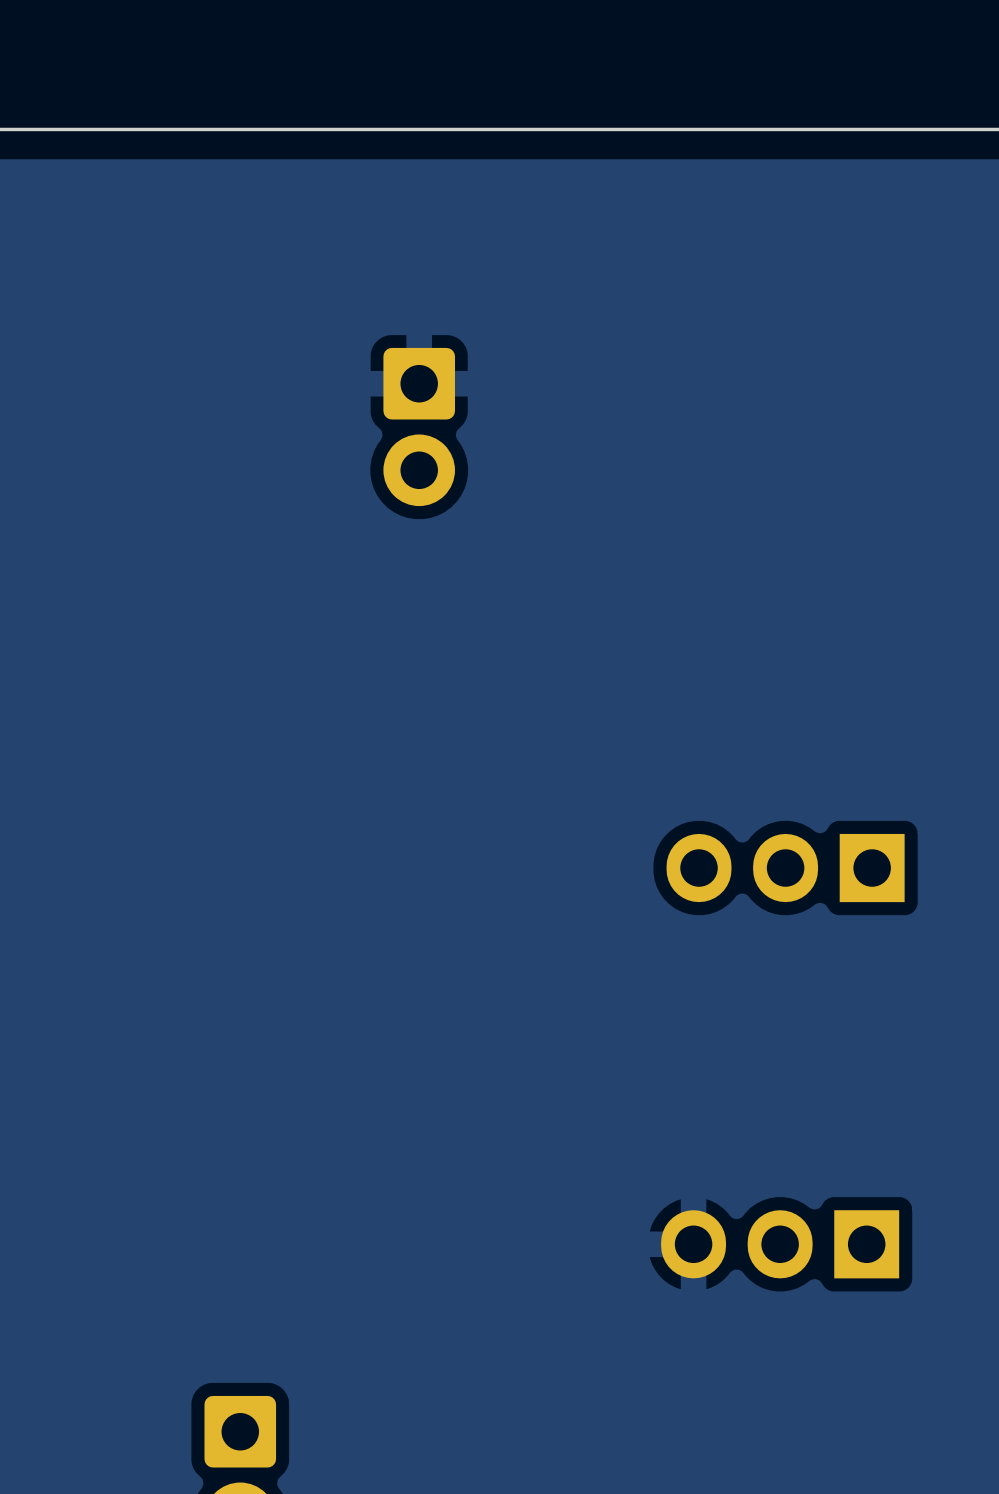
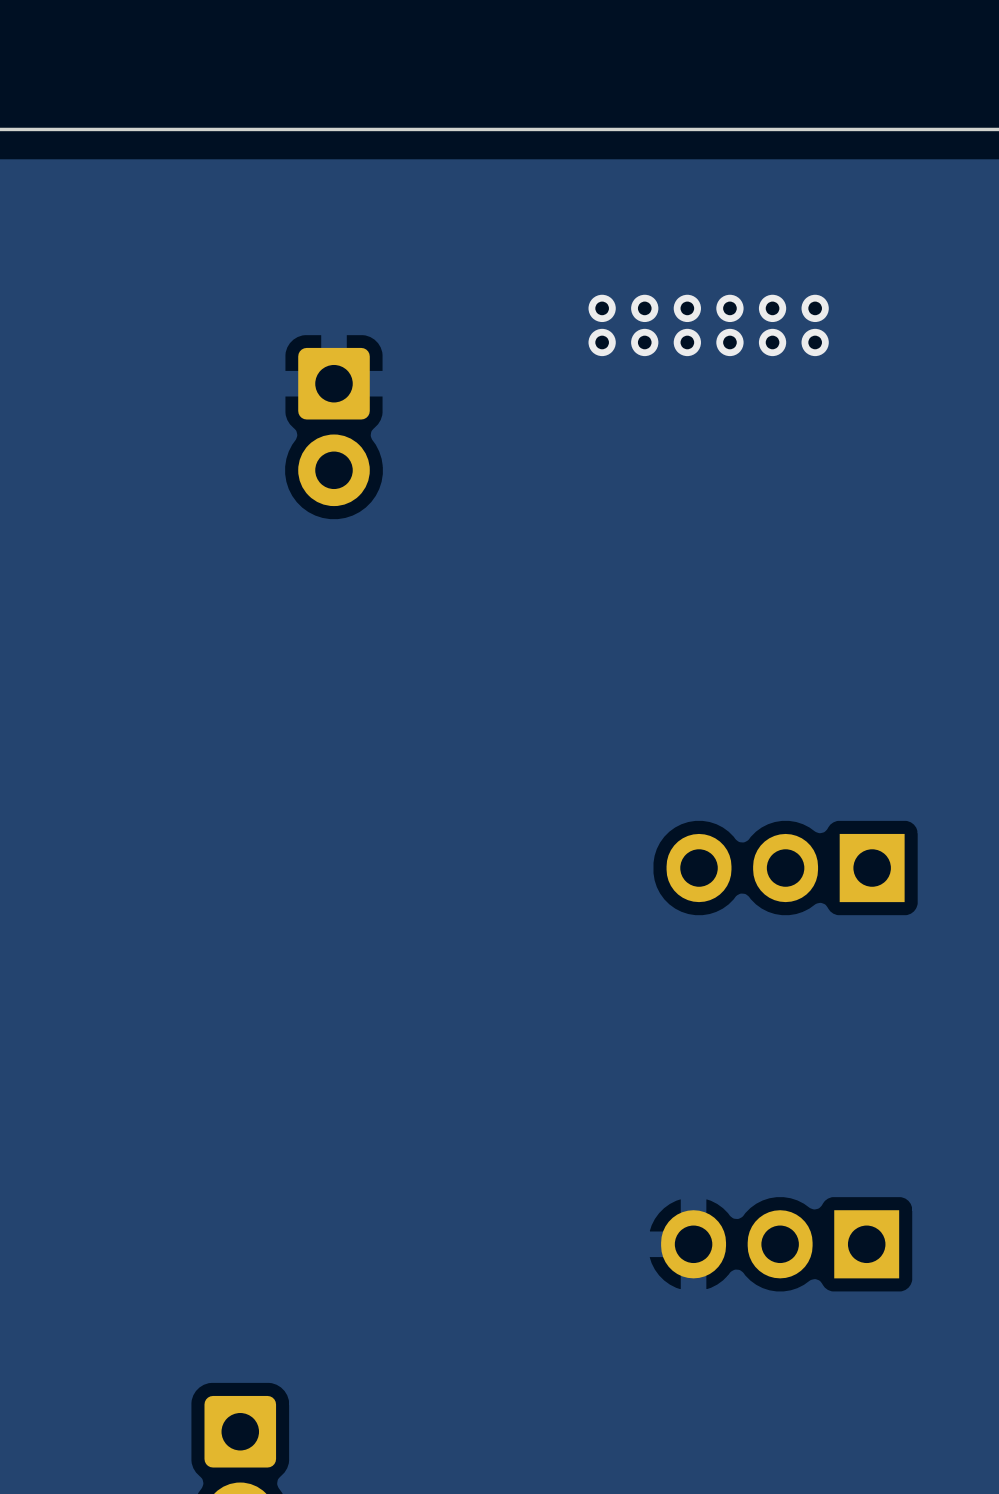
via: none -> (602, 308)
via: none -> (644, 308)
via: none -> (687, 308)
via: none -> (729, 308)
via: none -> (772, 308)
via: none -> (815, 308)
via: none -> (602, 342)
via: none -> (644, 342)
via: none -> (687, 342)
via: none -> (729, 342)
via: none -> (772, 342)
via: none -> (815, 342)
part position: (419, 427) -> (334, 427)

